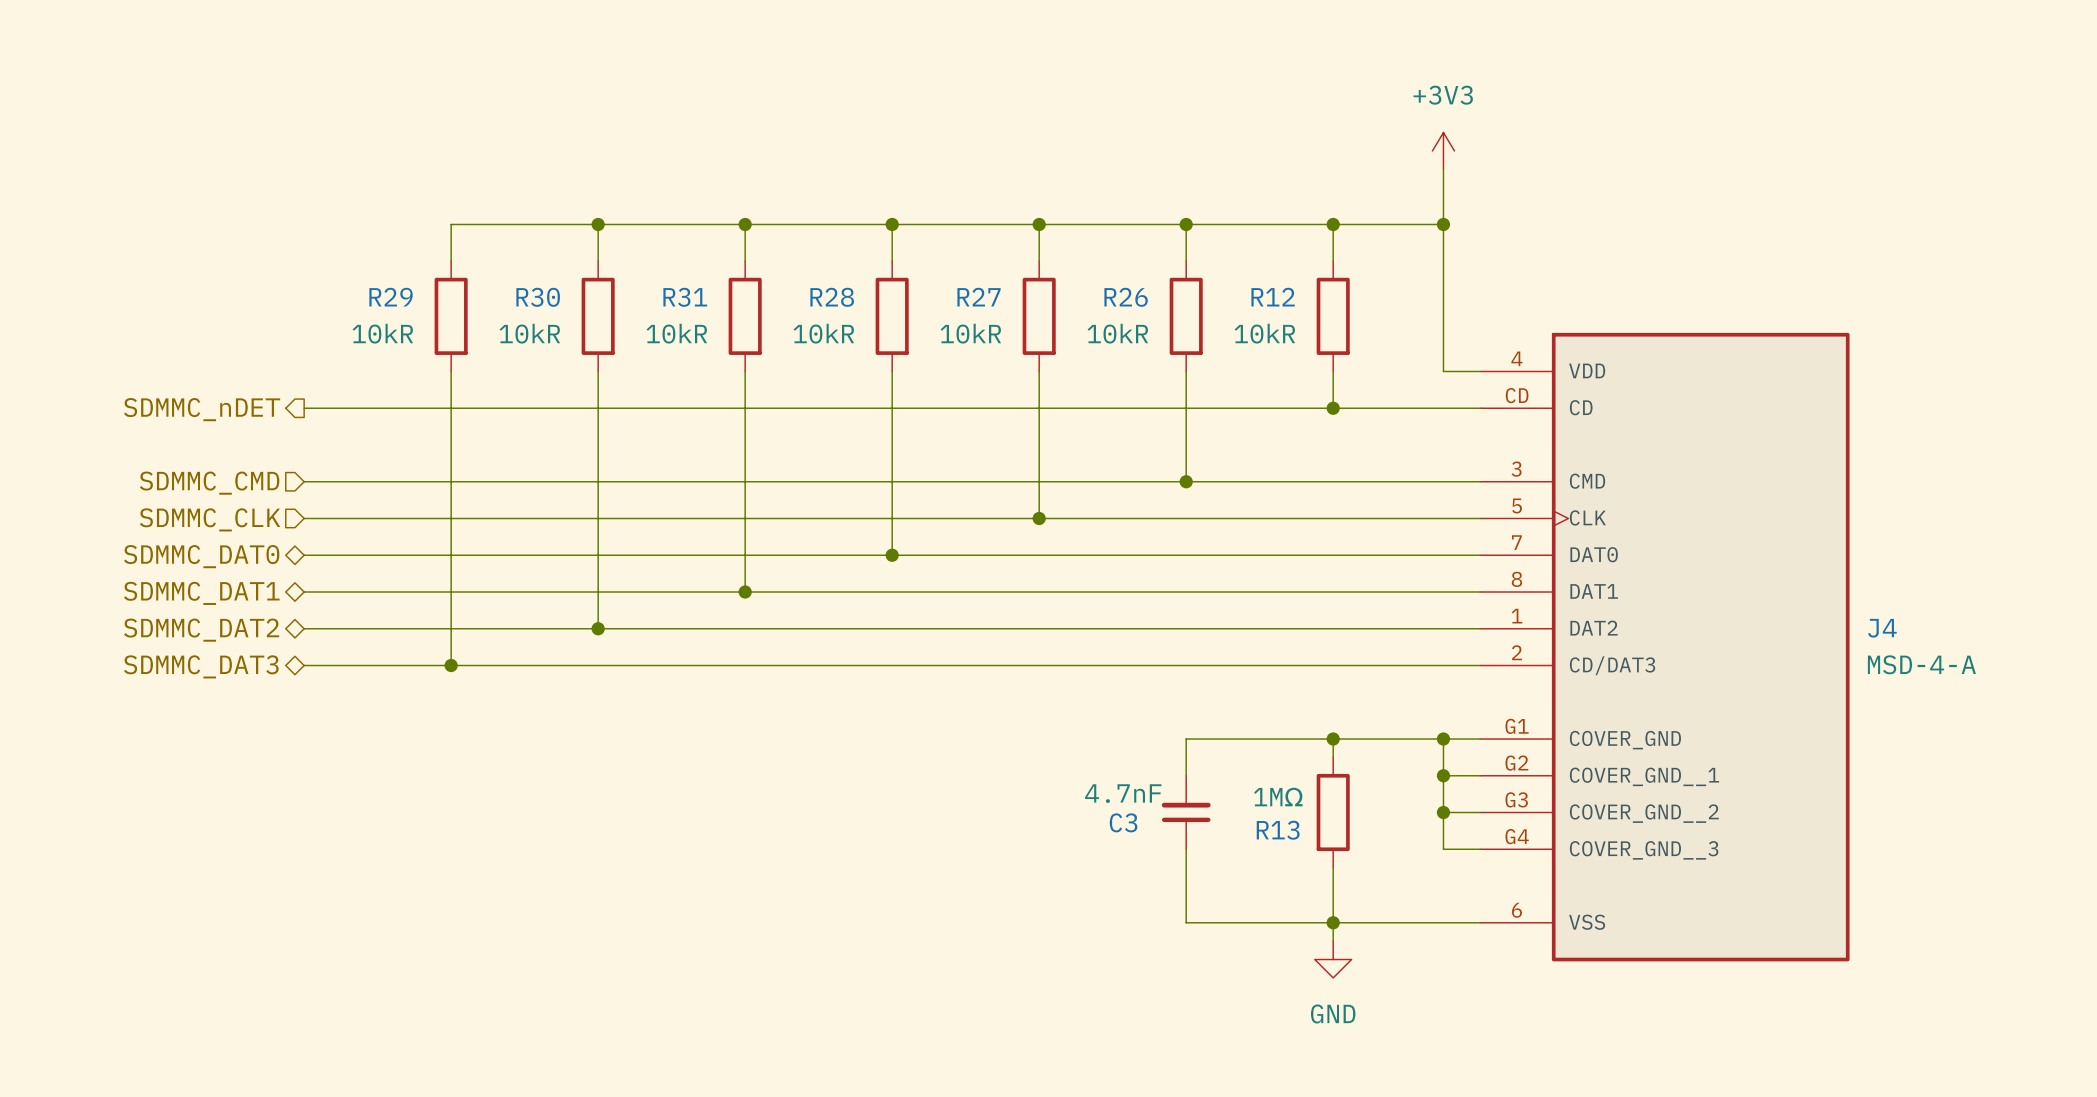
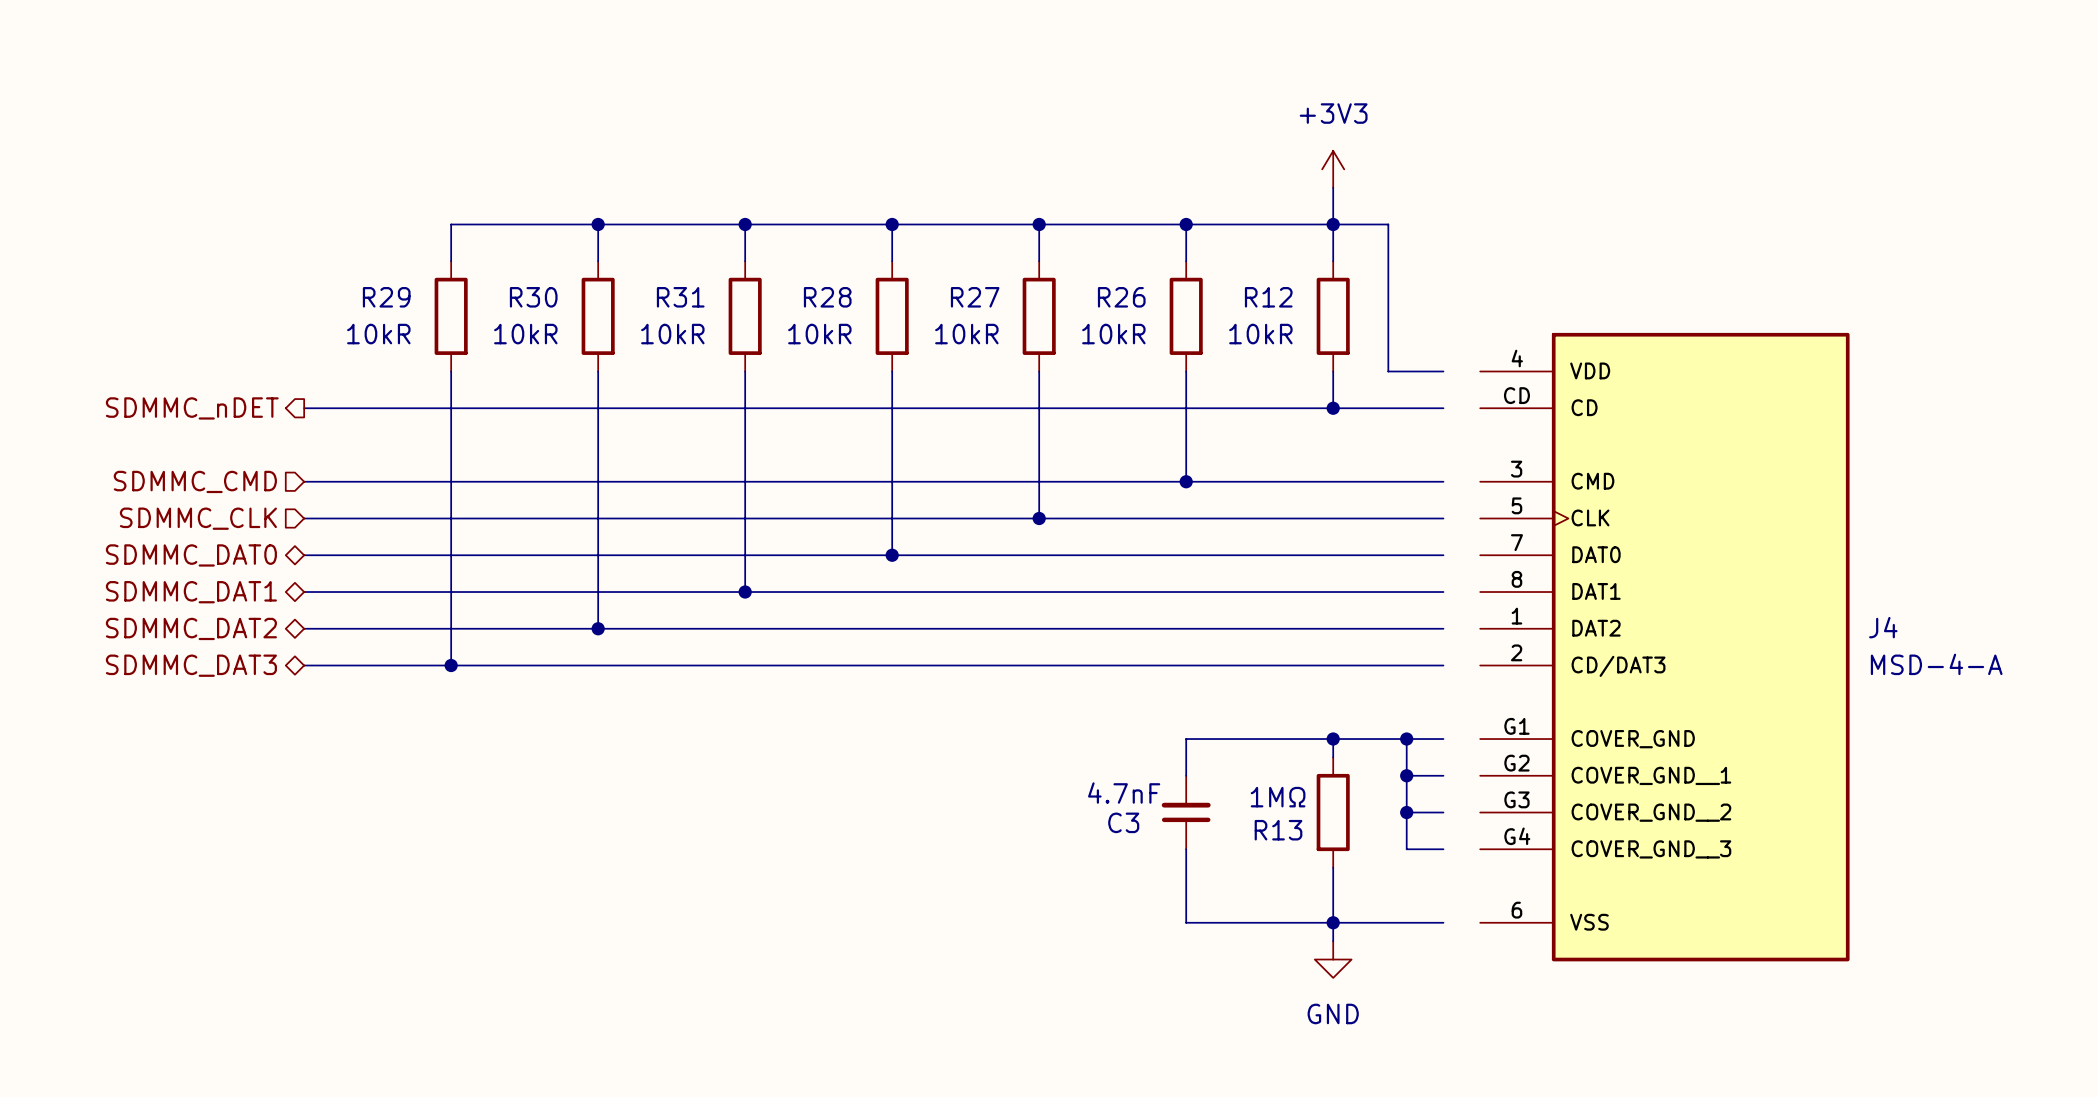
power symbol position: +3V3 (1443, 150) -> +3V3 (1333, 169)
wire: (1443, 169) (1443, 371) (1480, 371) -> none
wire: none -> (1333, 187) (1333, 224)
wire: (1388, 224) (1443, 224) -> (1388, 224) (1388, 371) (1443, 371)
junction: (1443, 224) -> none
wire: (1443, 408) (1480, 408) -> none
wire: (1443, 481) (1480, 481) -> none
wire: (1443, 518) (1480, 518) -> none
wire: (1443, 555) (1480, 555) -> none
wire: (1443, 592) (1480, 592) -> none
wire: (1443, 628) (1480, 628) -> none
wire: (1443, 665) (1480, 665) -> none
wire: none -> (1406, 739) (1406, 849) (1443, 849)
junction: none -> (1406, 739)
junction: (1443, 739) -> none
wire: (1480, 739) (1443, 739) (1443, 849) (1480, 849) -> none
junction: none -> (1406, 775)
wire: (1443, 775) (1480, 775) -> (1443, 775) (1406, 775)
junction: (1443, 775) -> none
junction: none -> (1406, 812)
wire: (1443, 812) (1480, 812) -> (1443, 812) (1406, 812)
junction: (1443, 812) -> none
wire: (1443, 922) (1480, 922) -> none

